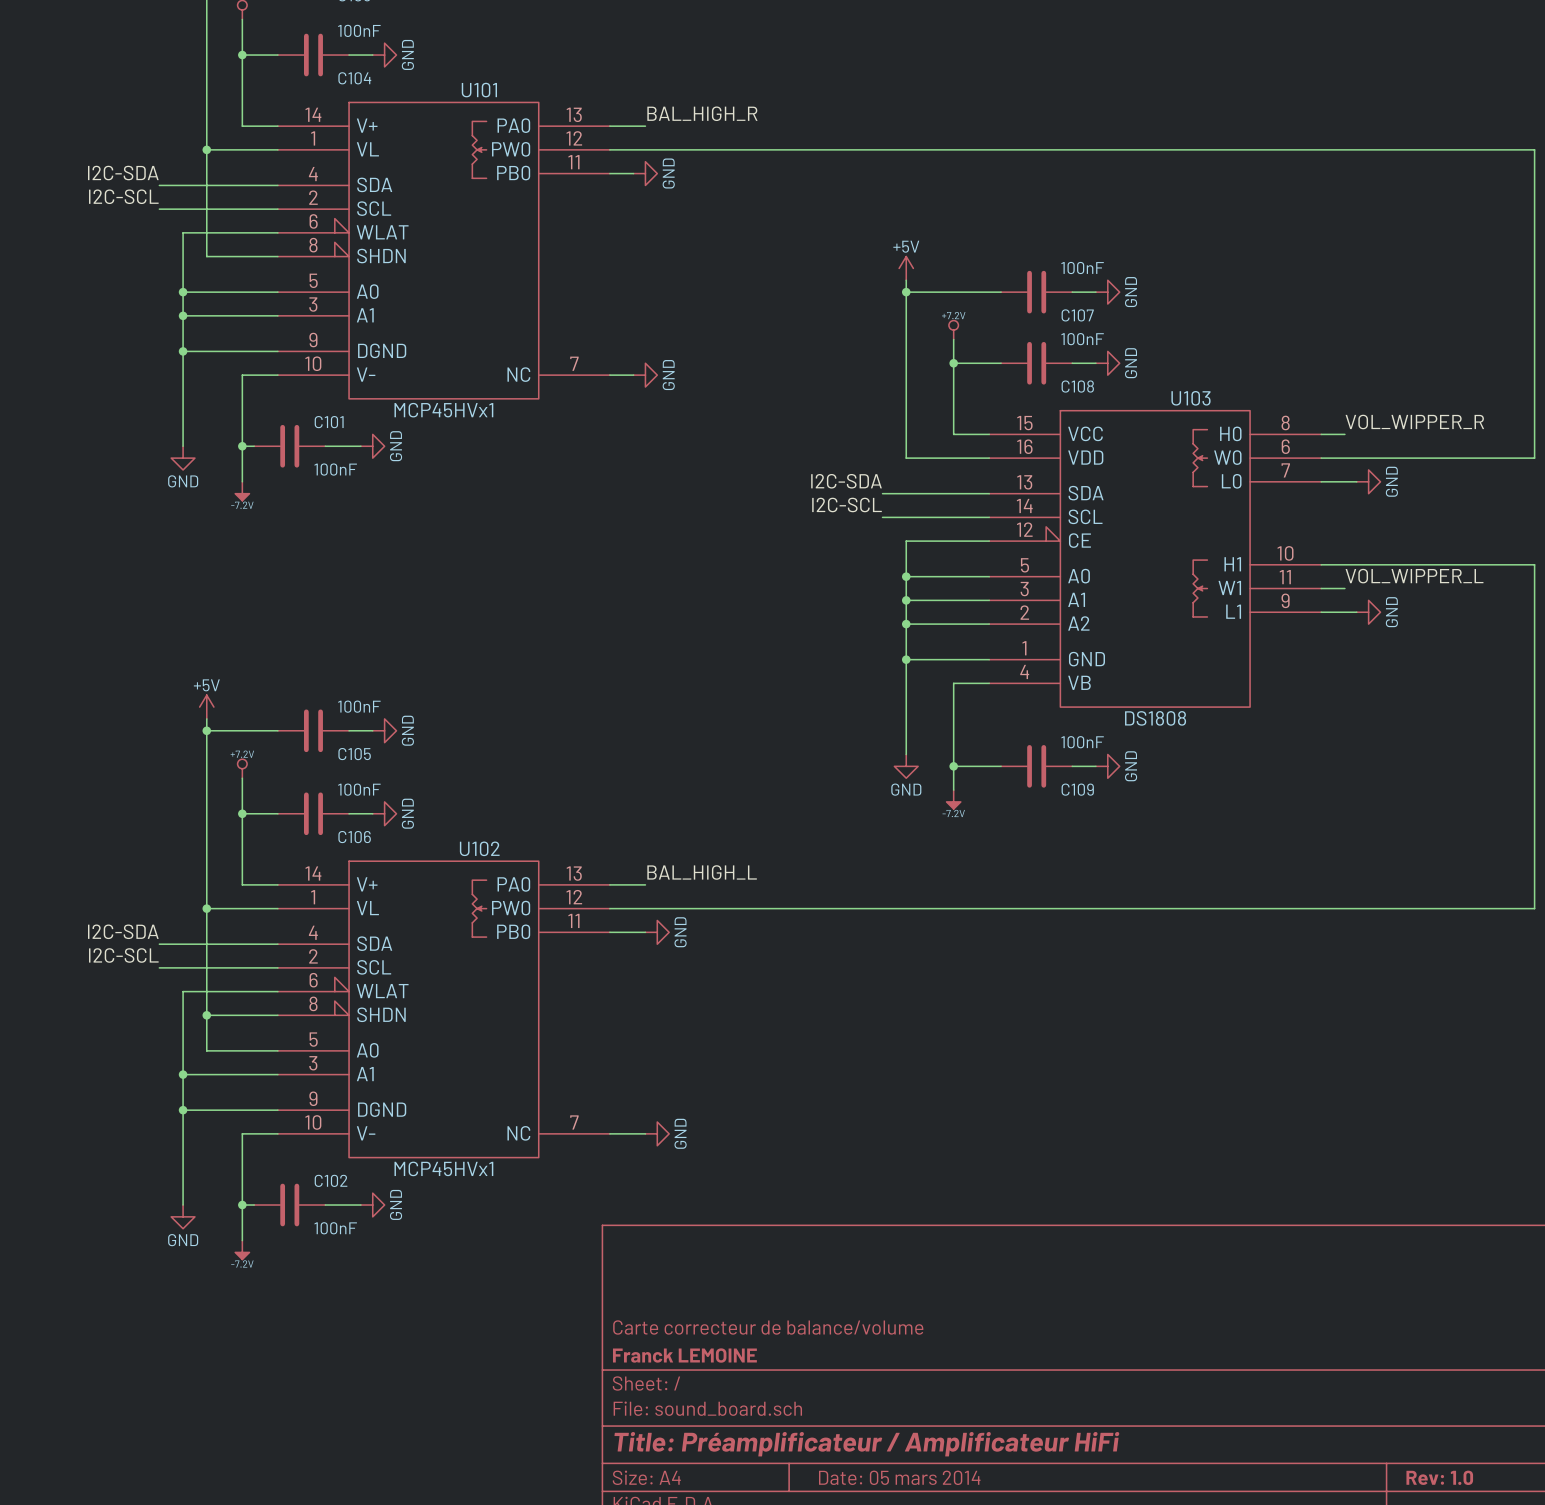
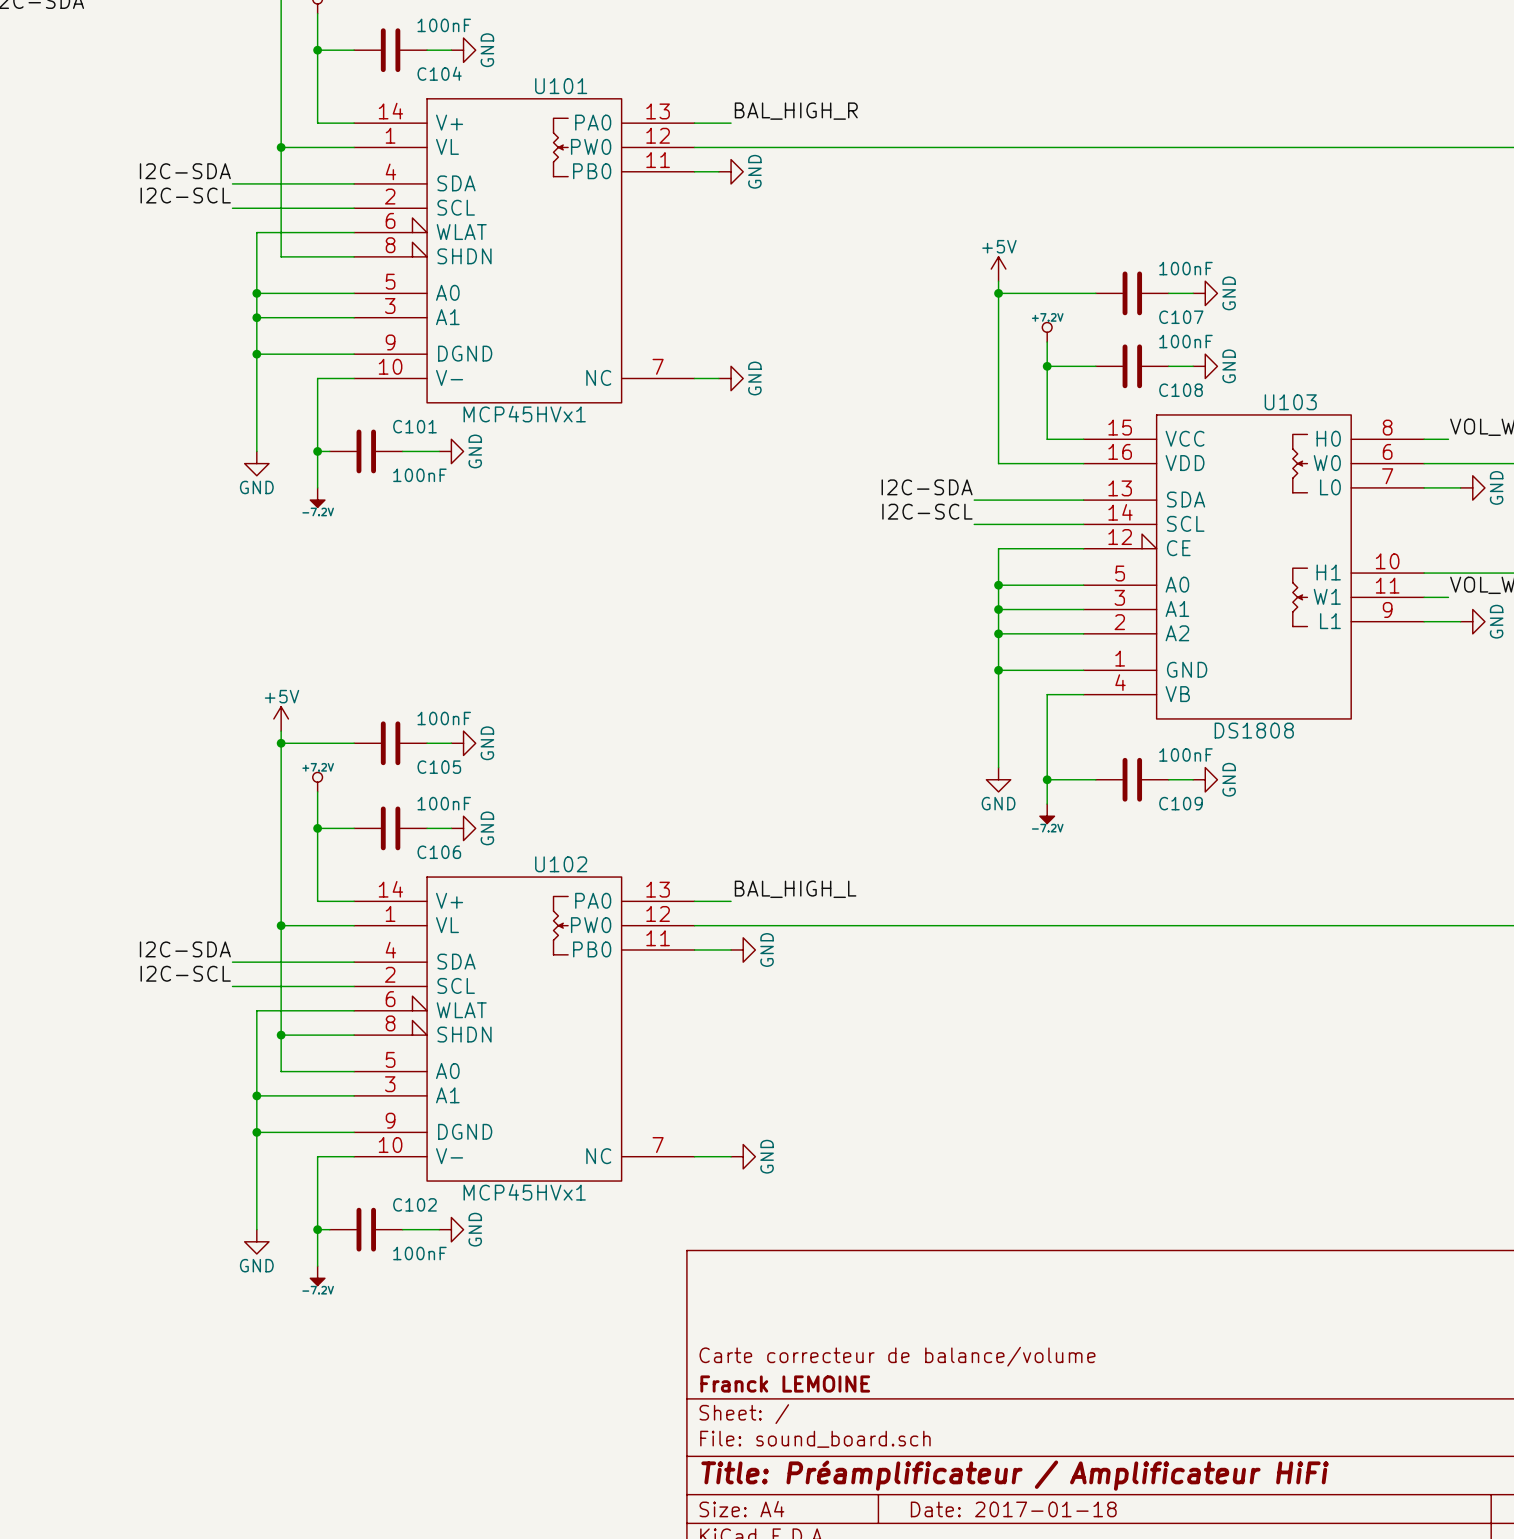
title block: Date: 05 mars 2014 (899, 1477) -> Date: 2017-01-18 (1013, 1509)

